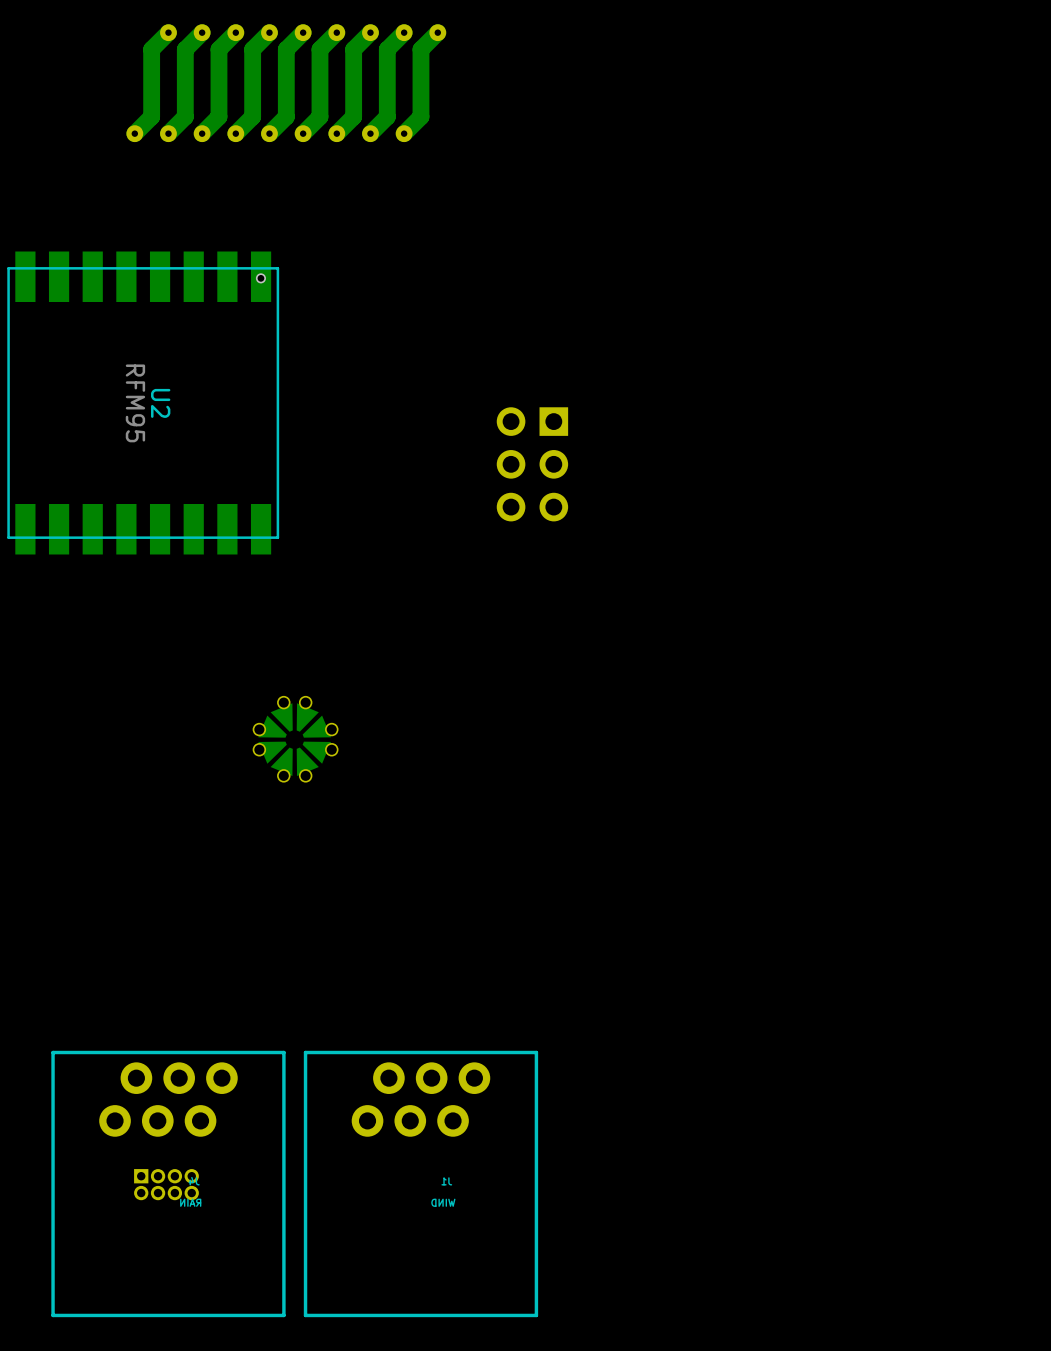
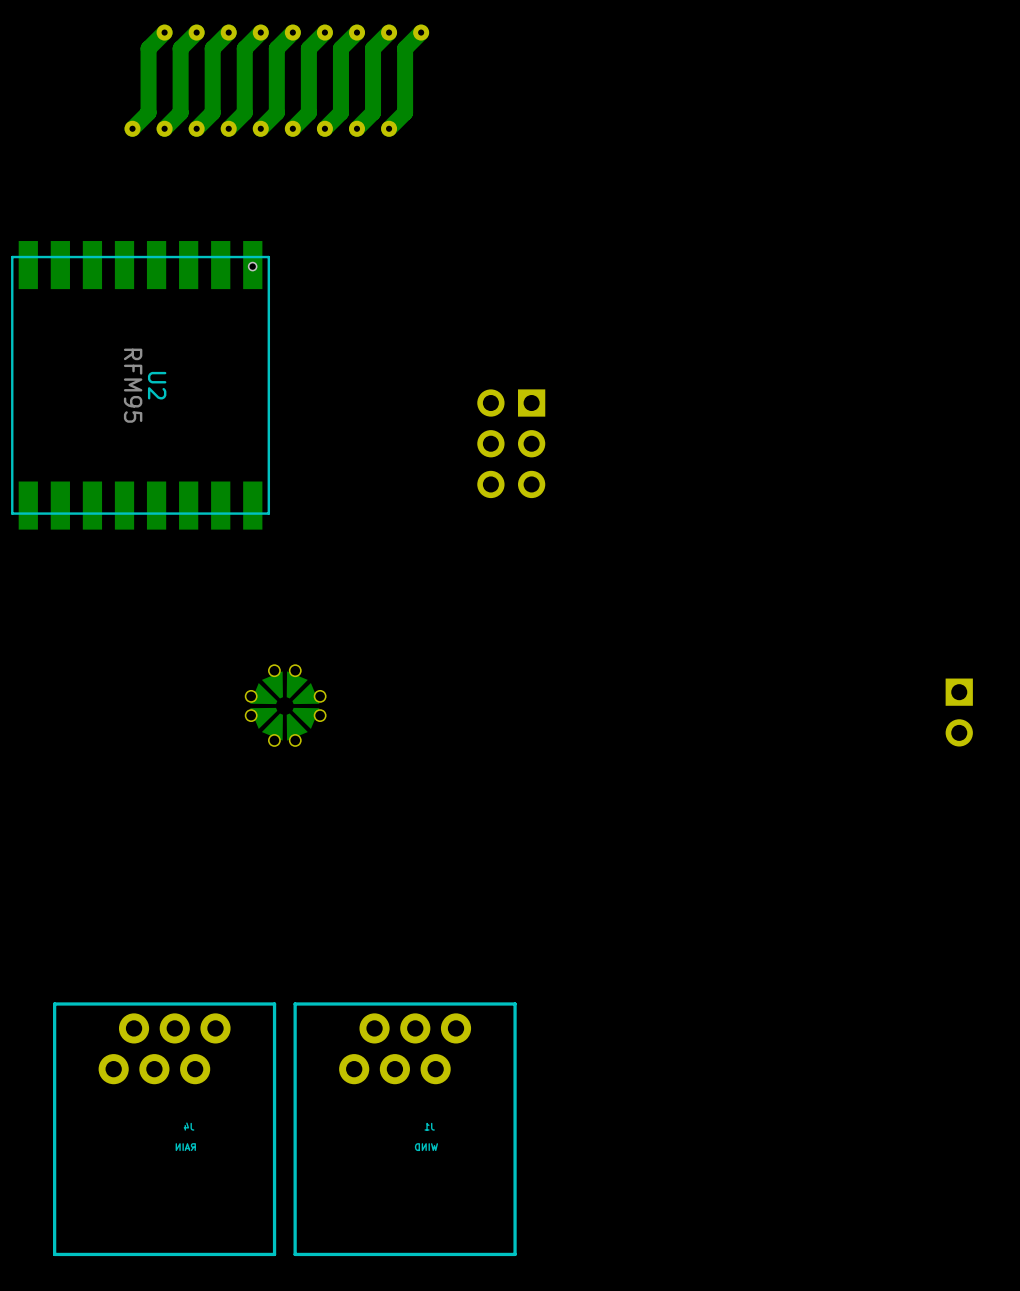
part: none -> (959, 712)
part: (166, 1184) -> none

